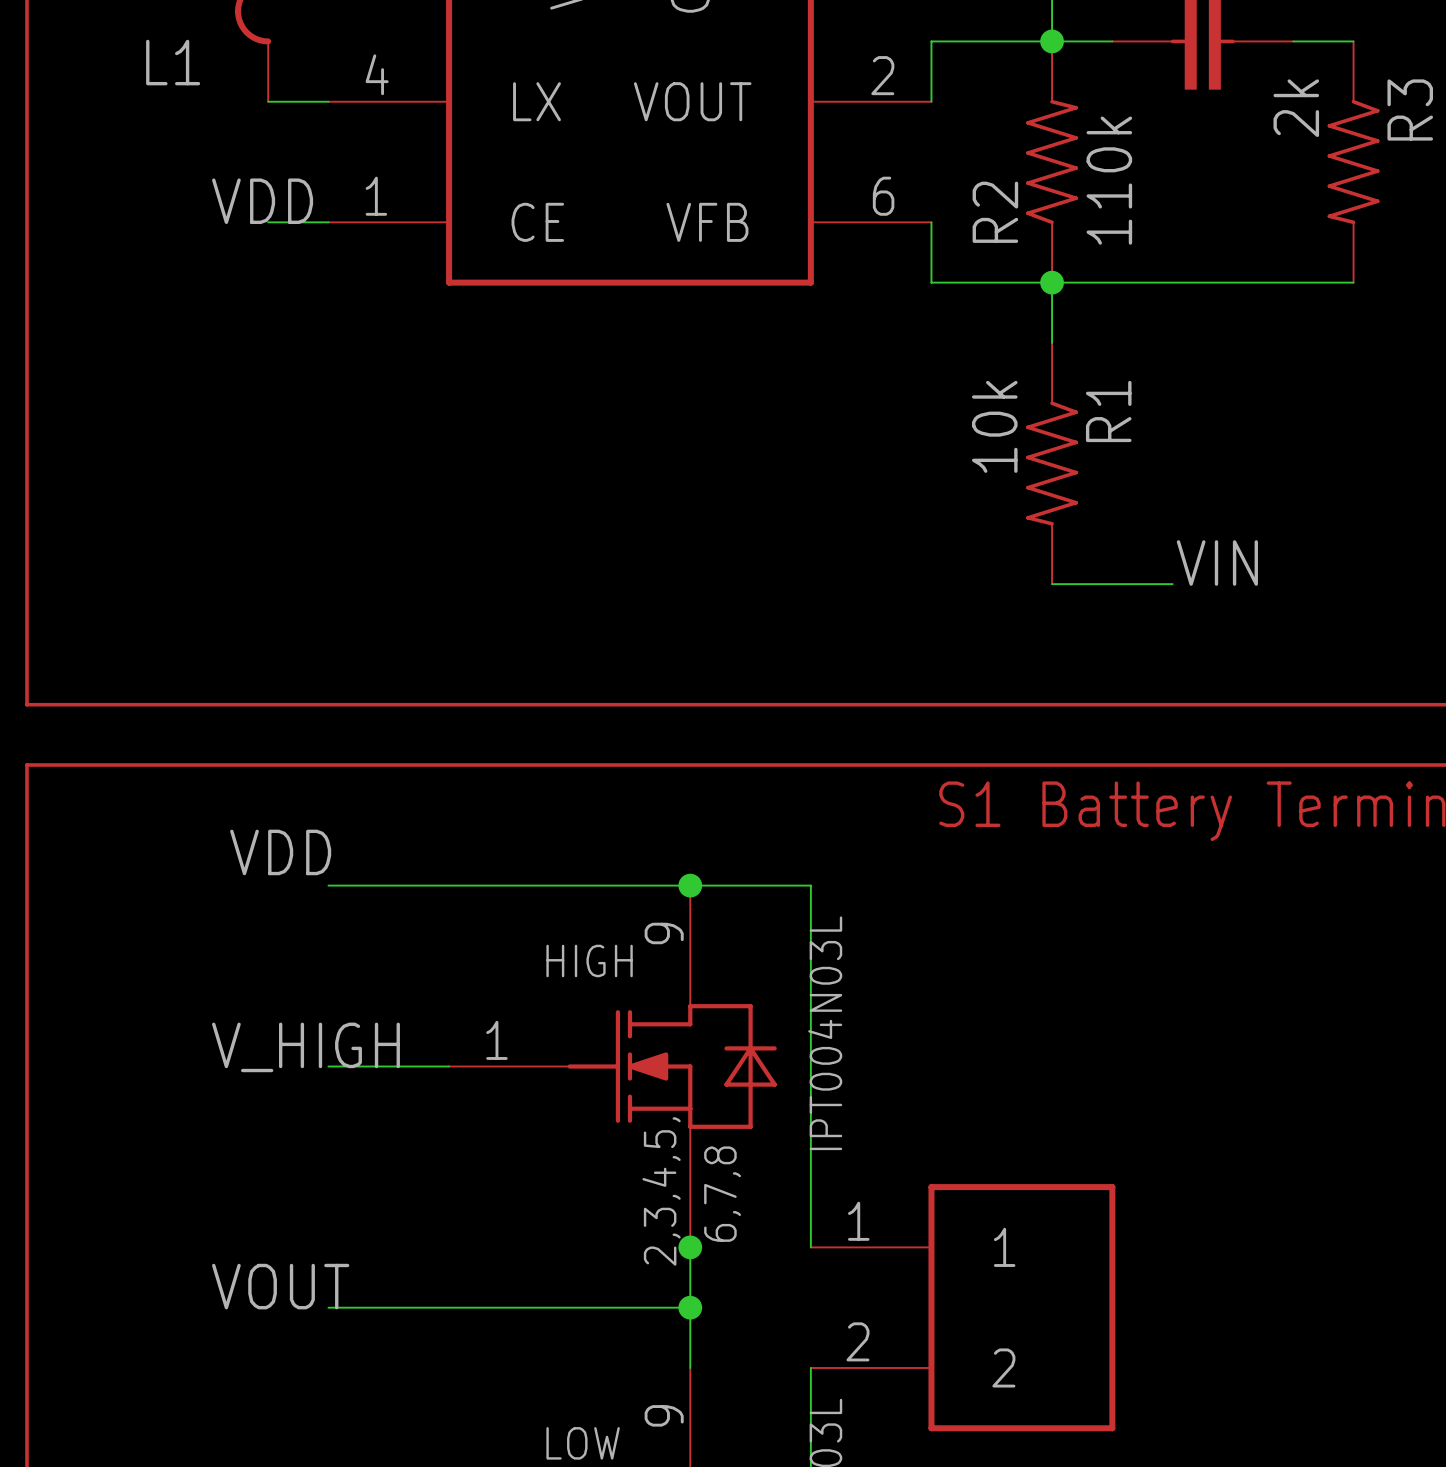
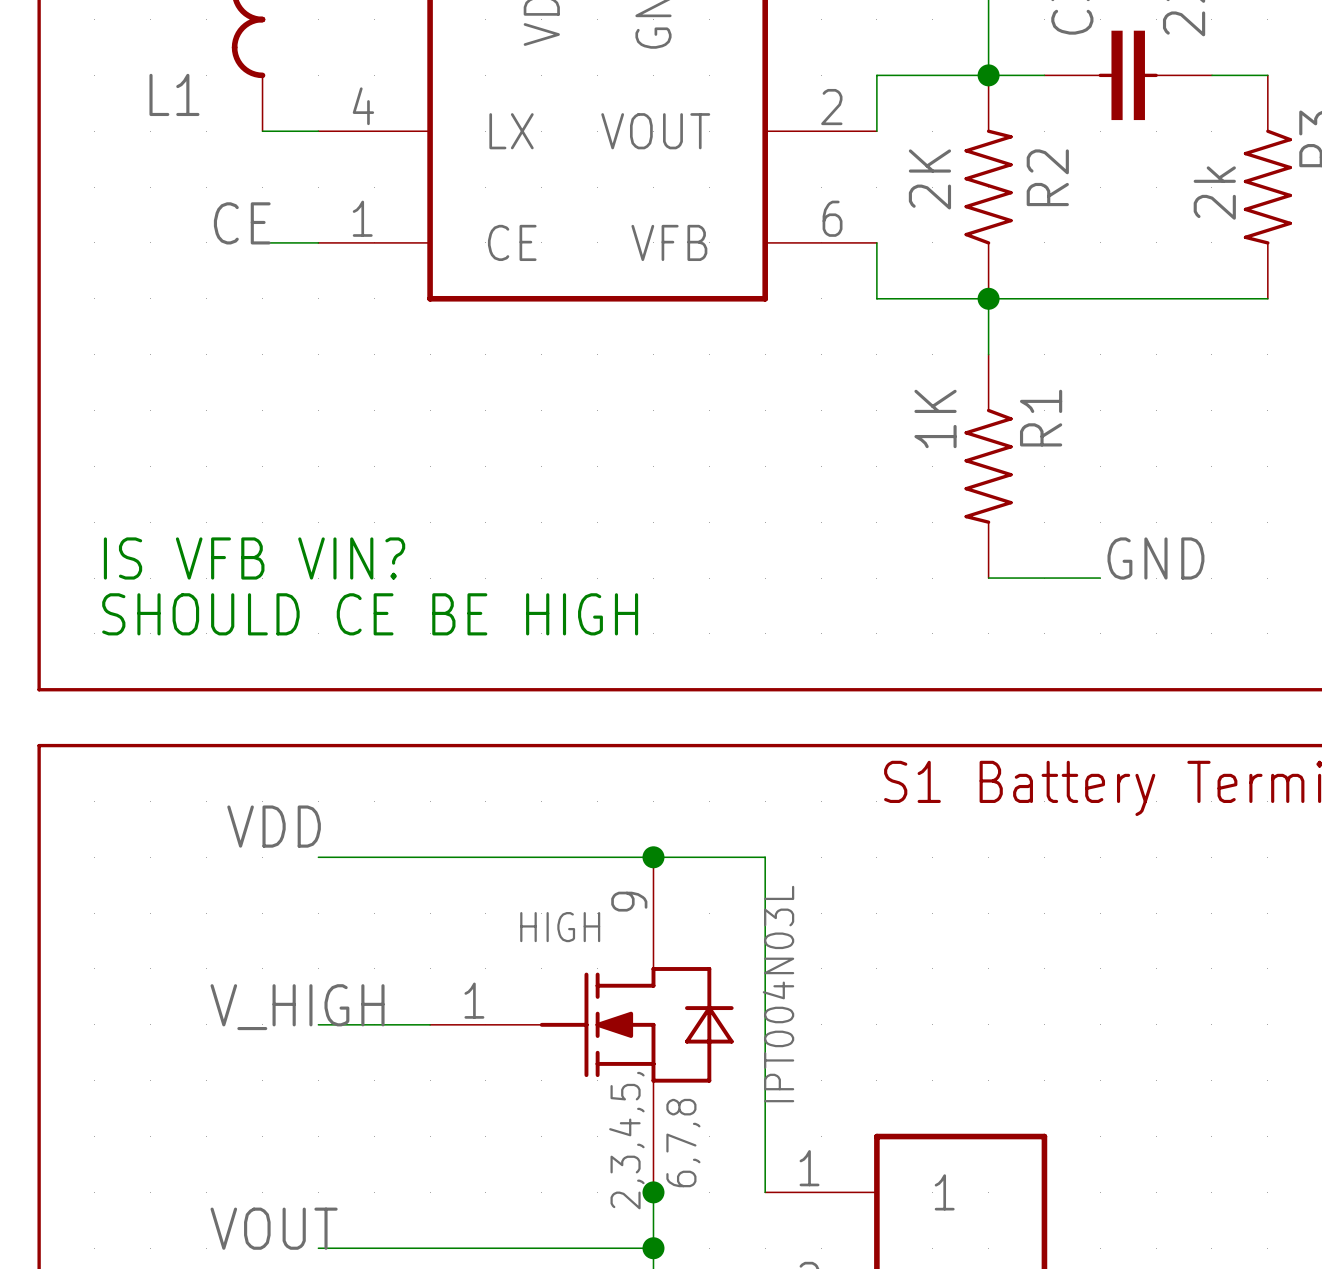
R3 value position: 2k (1296, 108) -> 2k (1214, 193)
R2 value: 110k (1109, 180) -> 2K (929, 179)
label: VDD (262, 201) -> CE (242, 223)
R2 name position: R2 (995, 212) -> R2 (1047, 177)
R1 value: 10k (994, 426) -> 1K (935, 418)
text: none -> IS VFB VIN? (254, 558)
label: VIN (1217, 563) -> GND (1155, 558)
text: none -> SHOULD CE BE HIGH (370, 614)

